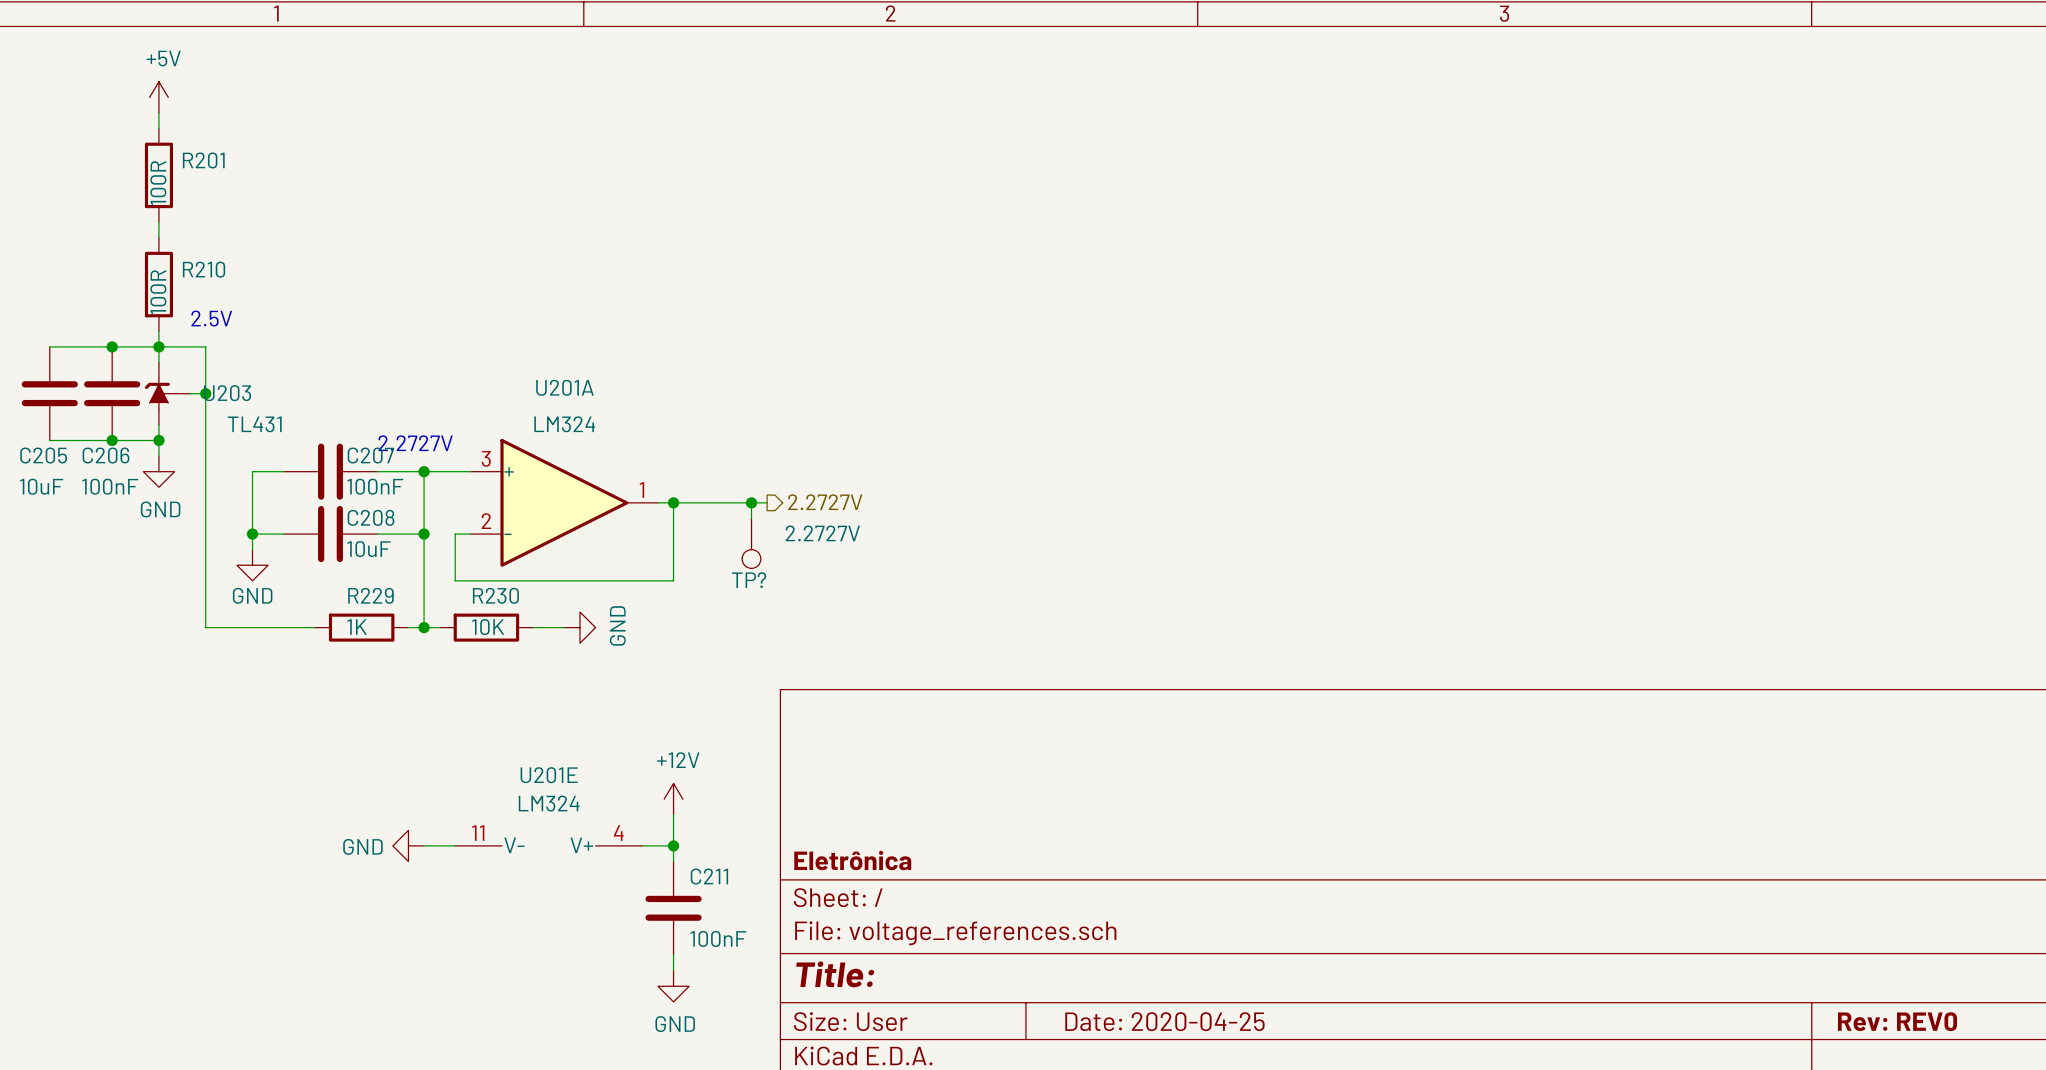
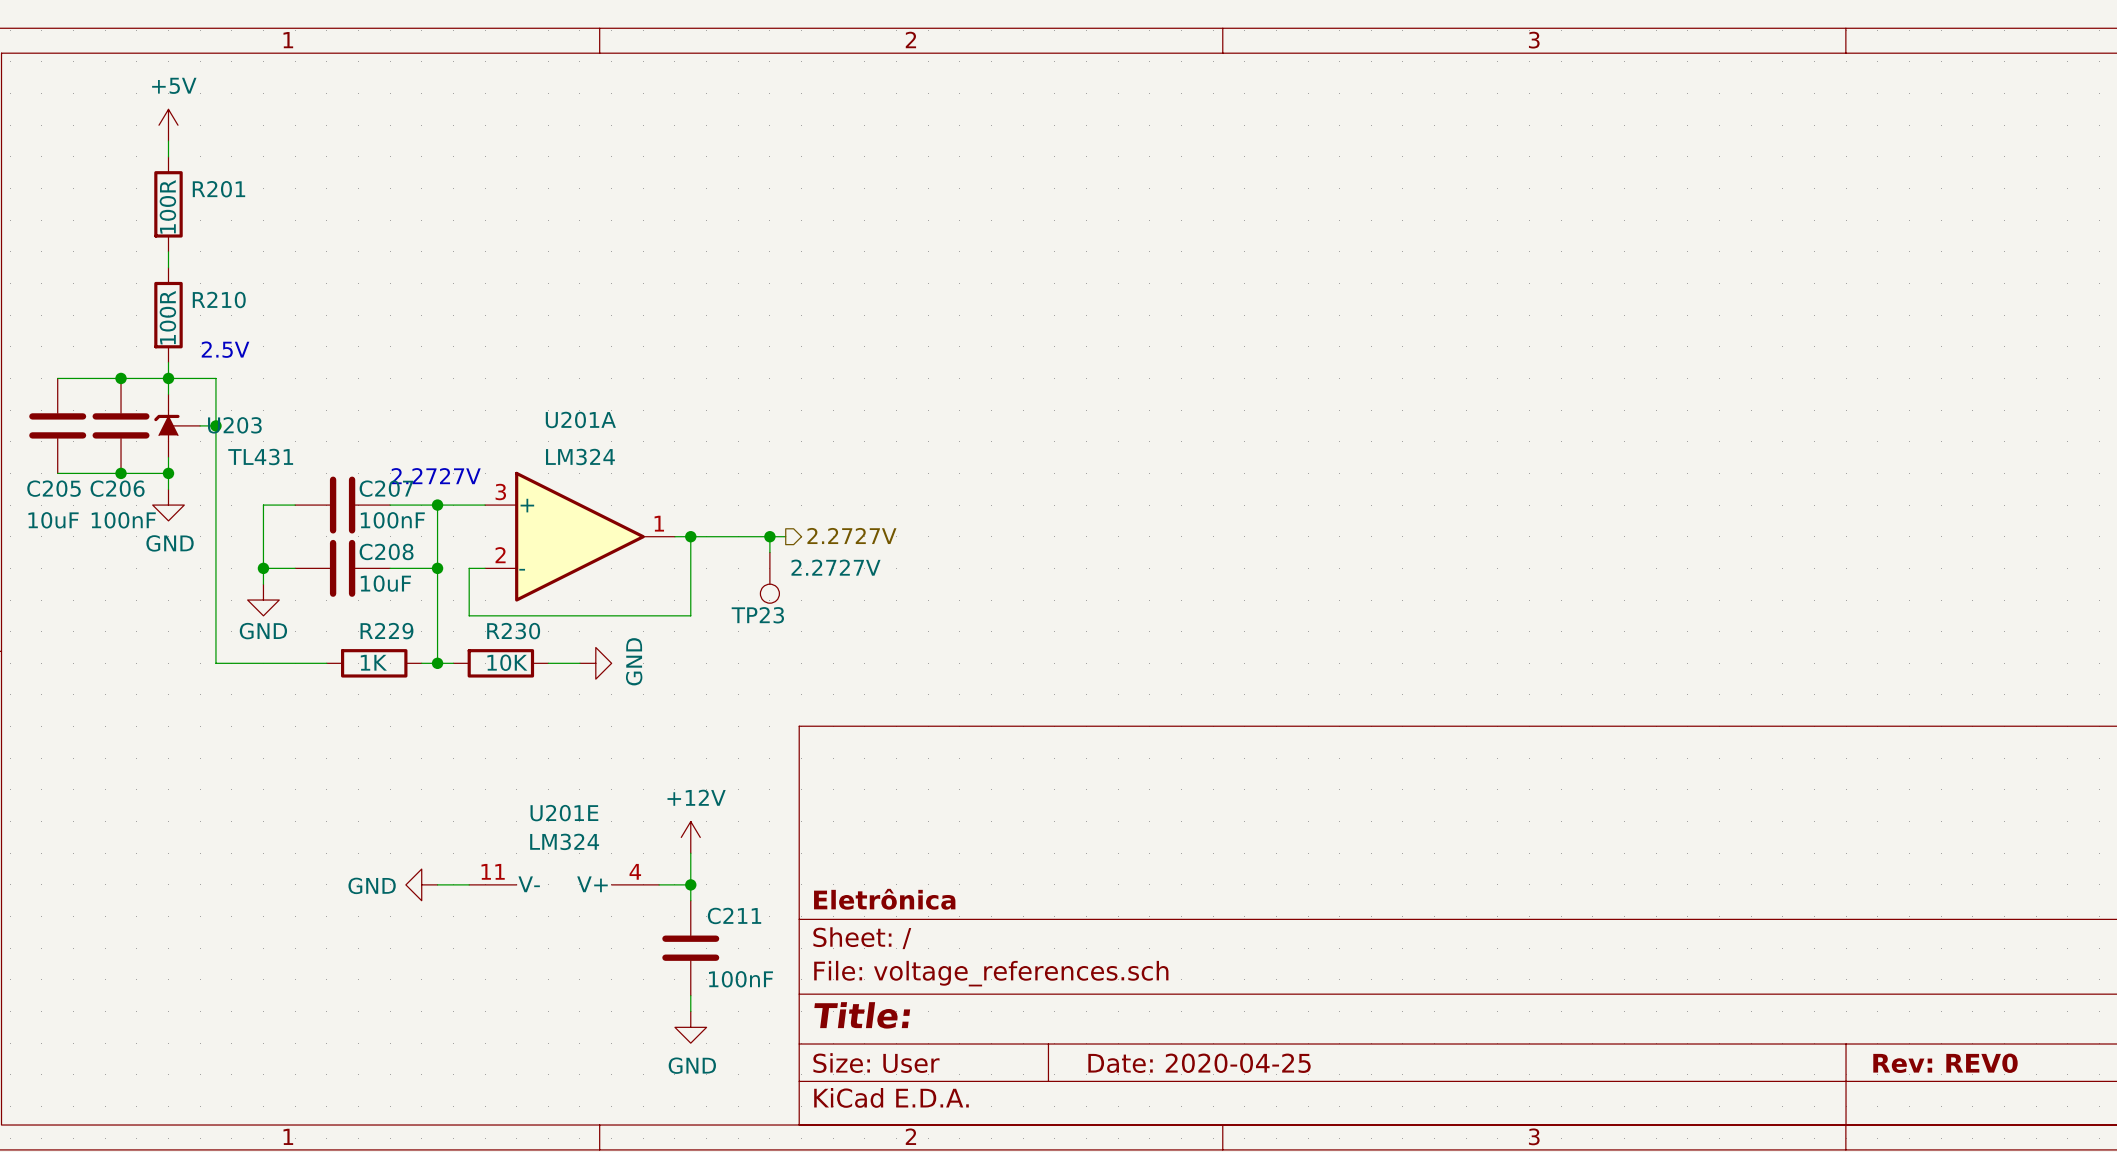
TP? name: TP? (749, 580) -> TP23 (757, 615)

